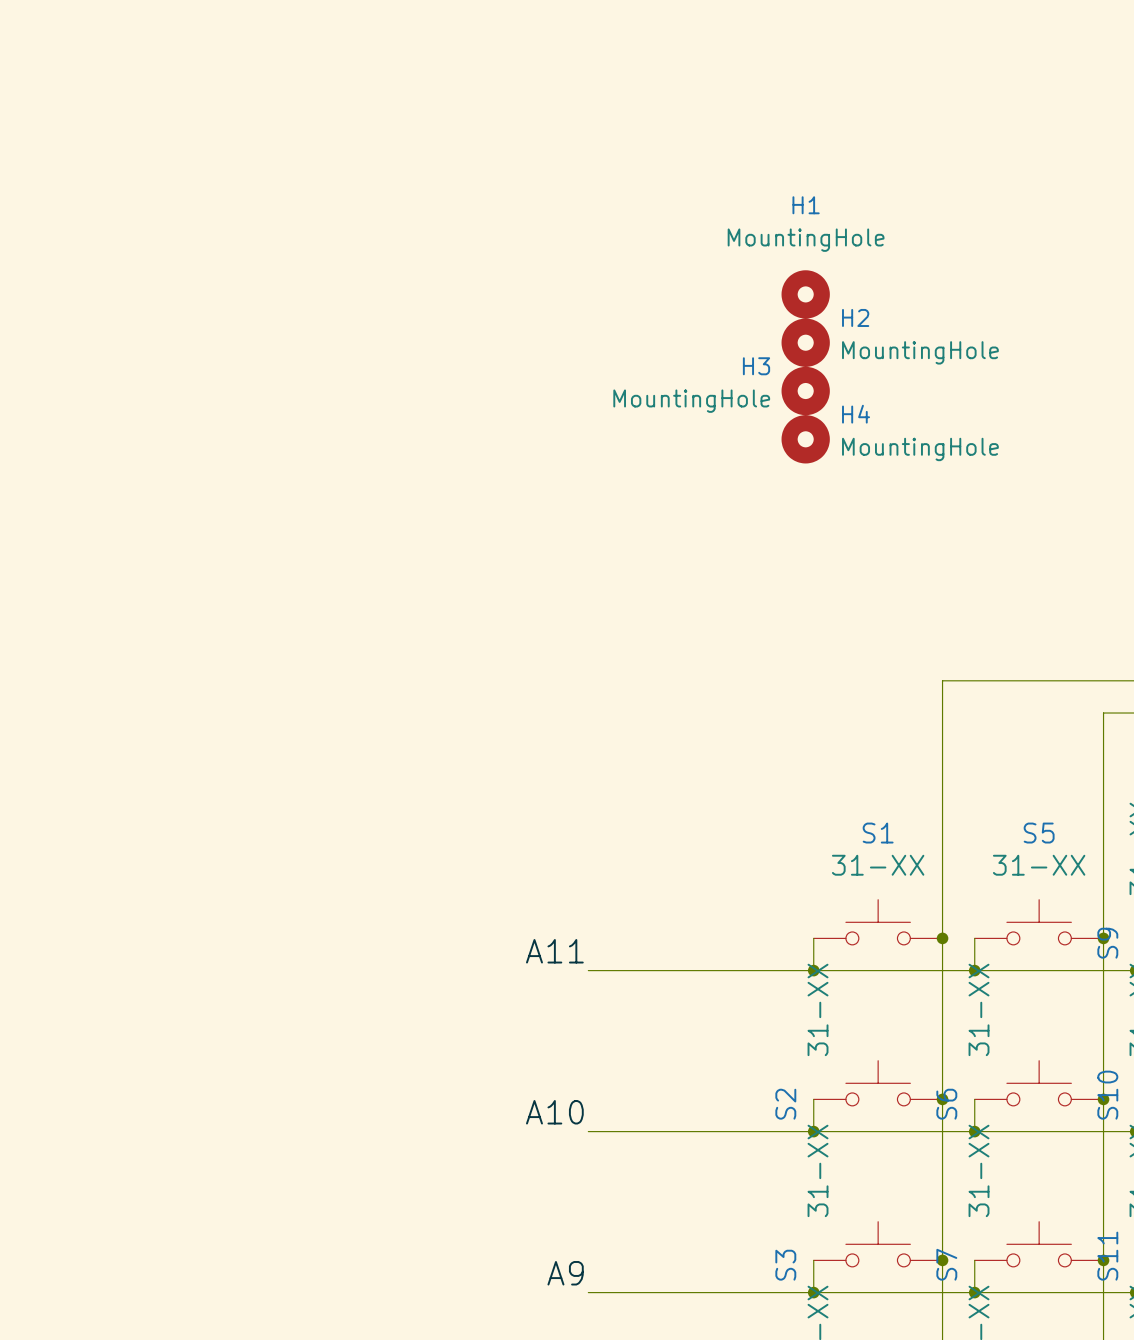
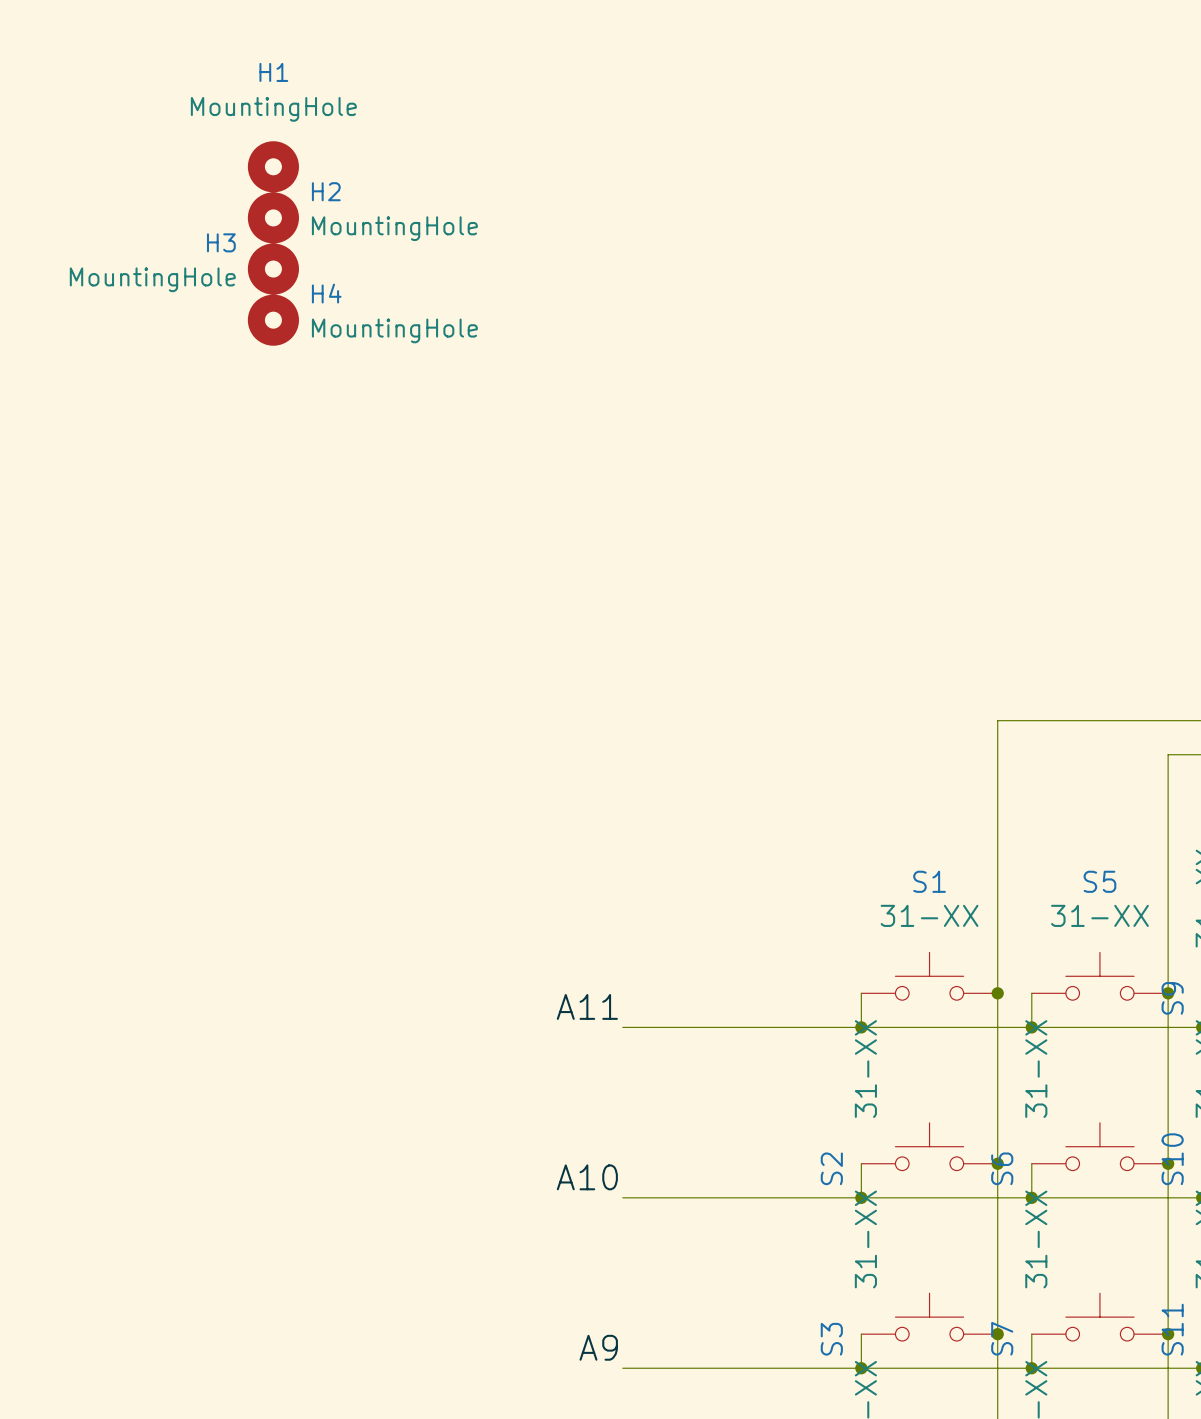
H1 position: (805, 294) -> (273, 166)
H2 position: (805, 342) -> (273, 217)
H3 position: (805, 391) -> (273, 269)
H4 position: (805, 439) -> (273, 320)

